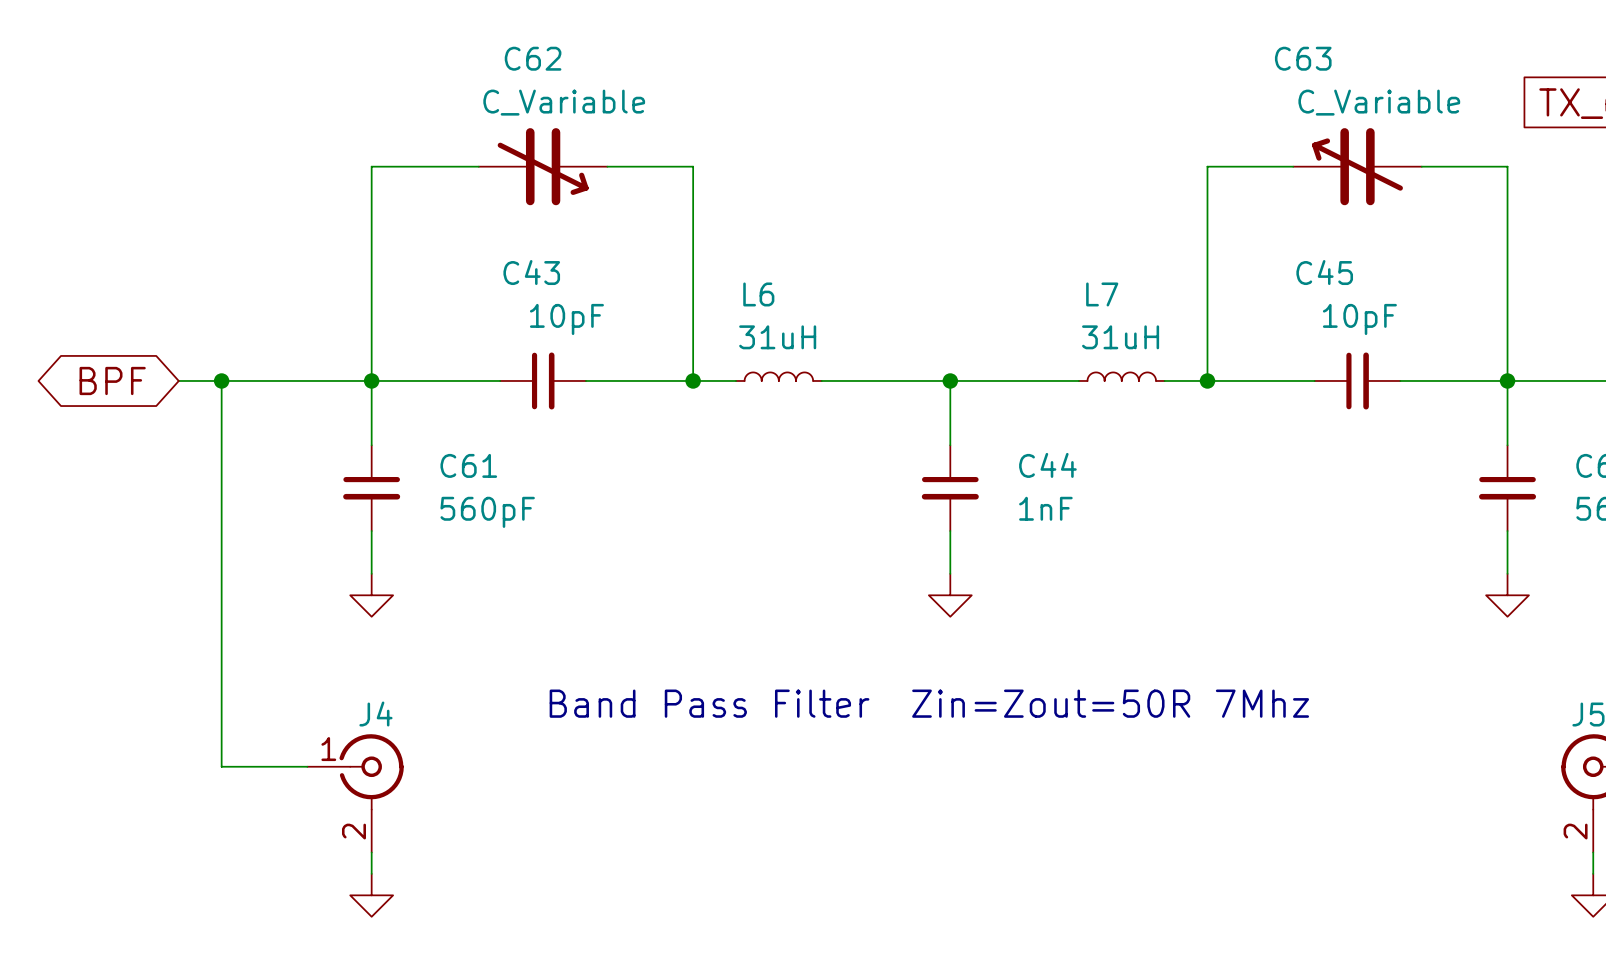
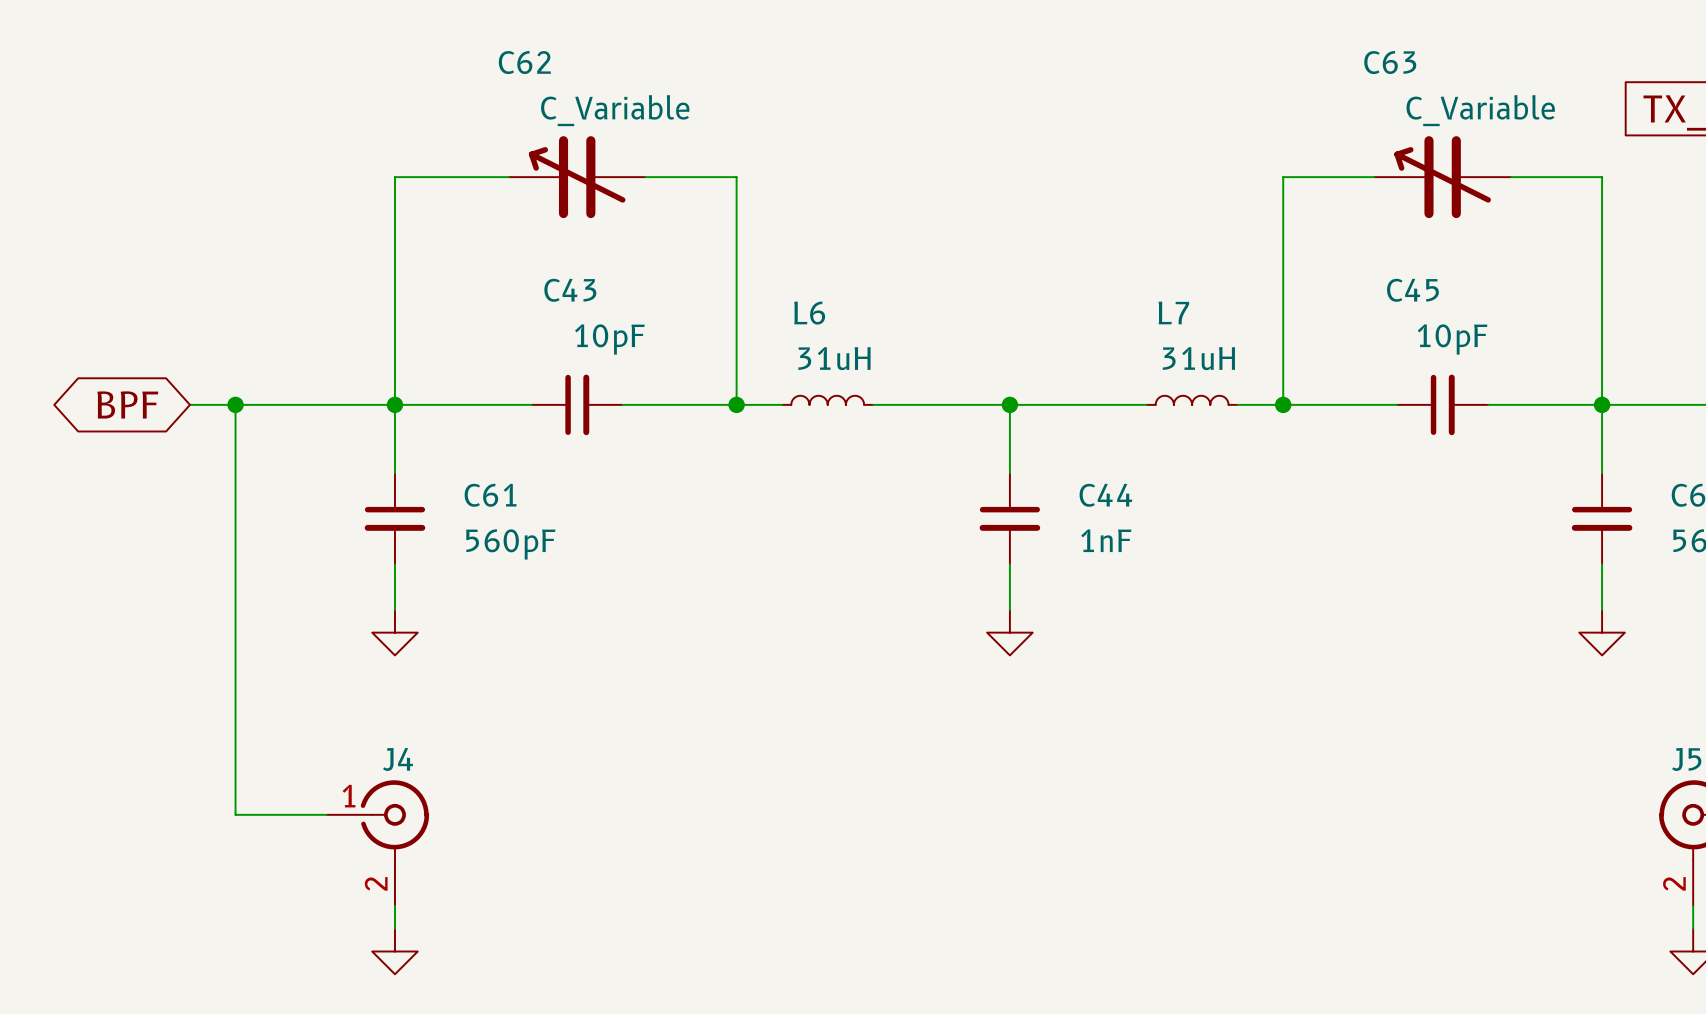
C62 name position: C62 (533, 58) -> C62 (524, 62)
C62 value position: C_Variable (564, 102) -> C_Variable (615, 110)
C62 rotation: 0° (543, 166) -> 180° (577, 177)
text: Band Pass Filter Zin=Zout=50R 7Mhz (929, 703) -> none

